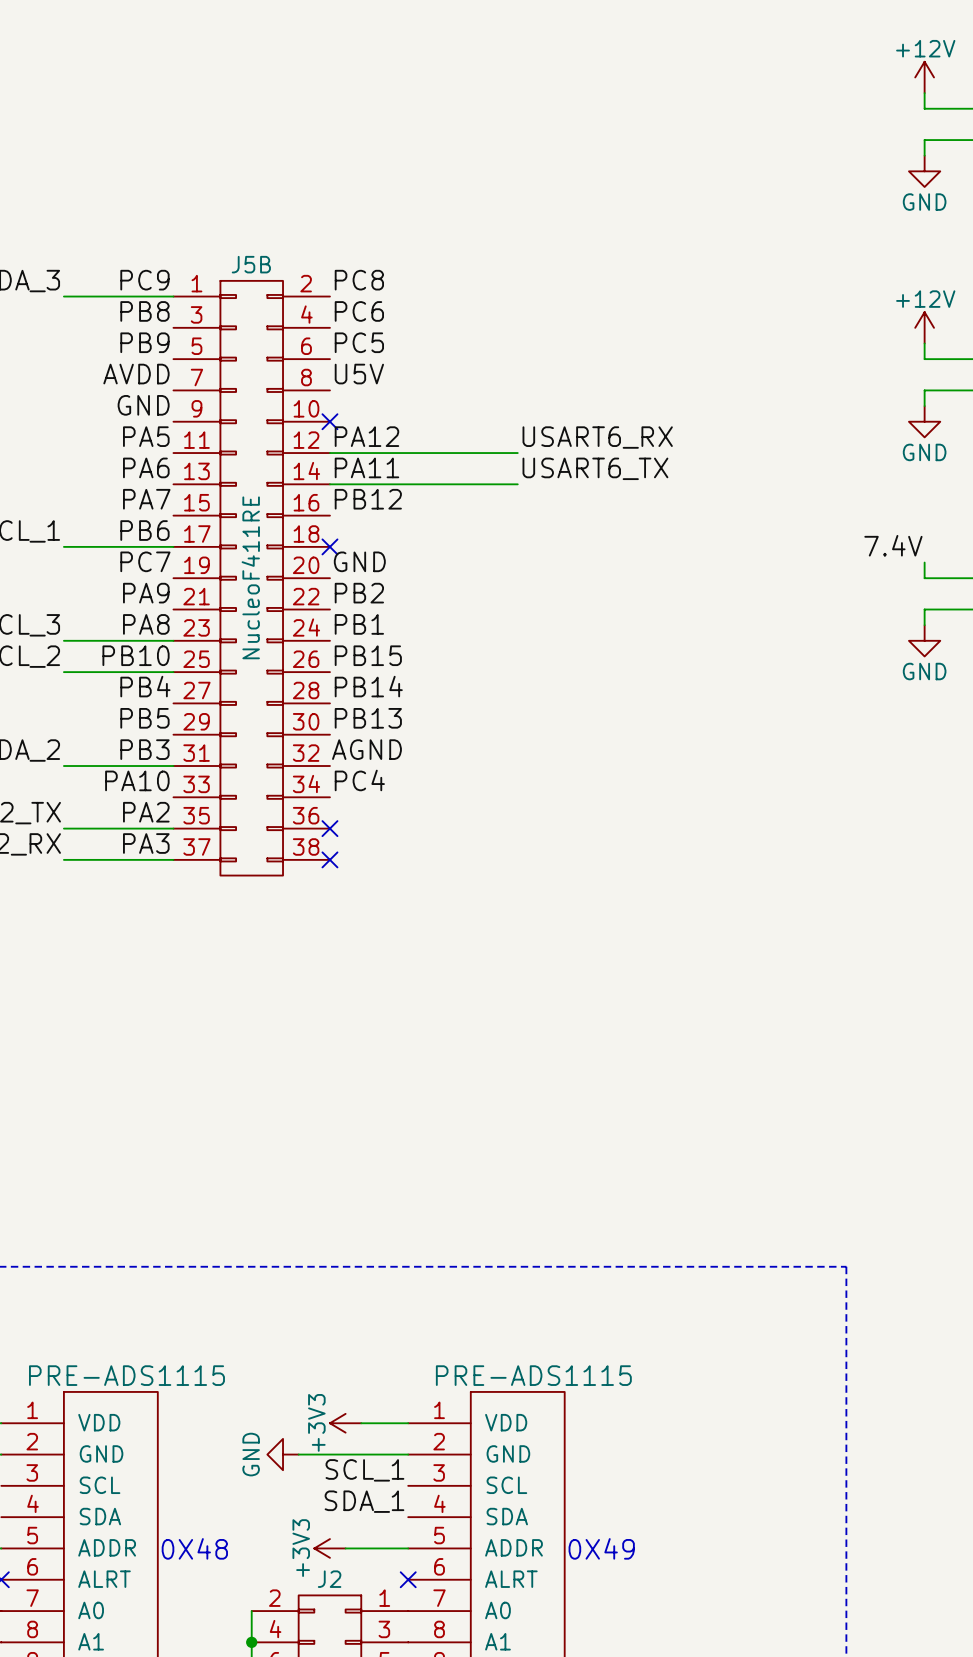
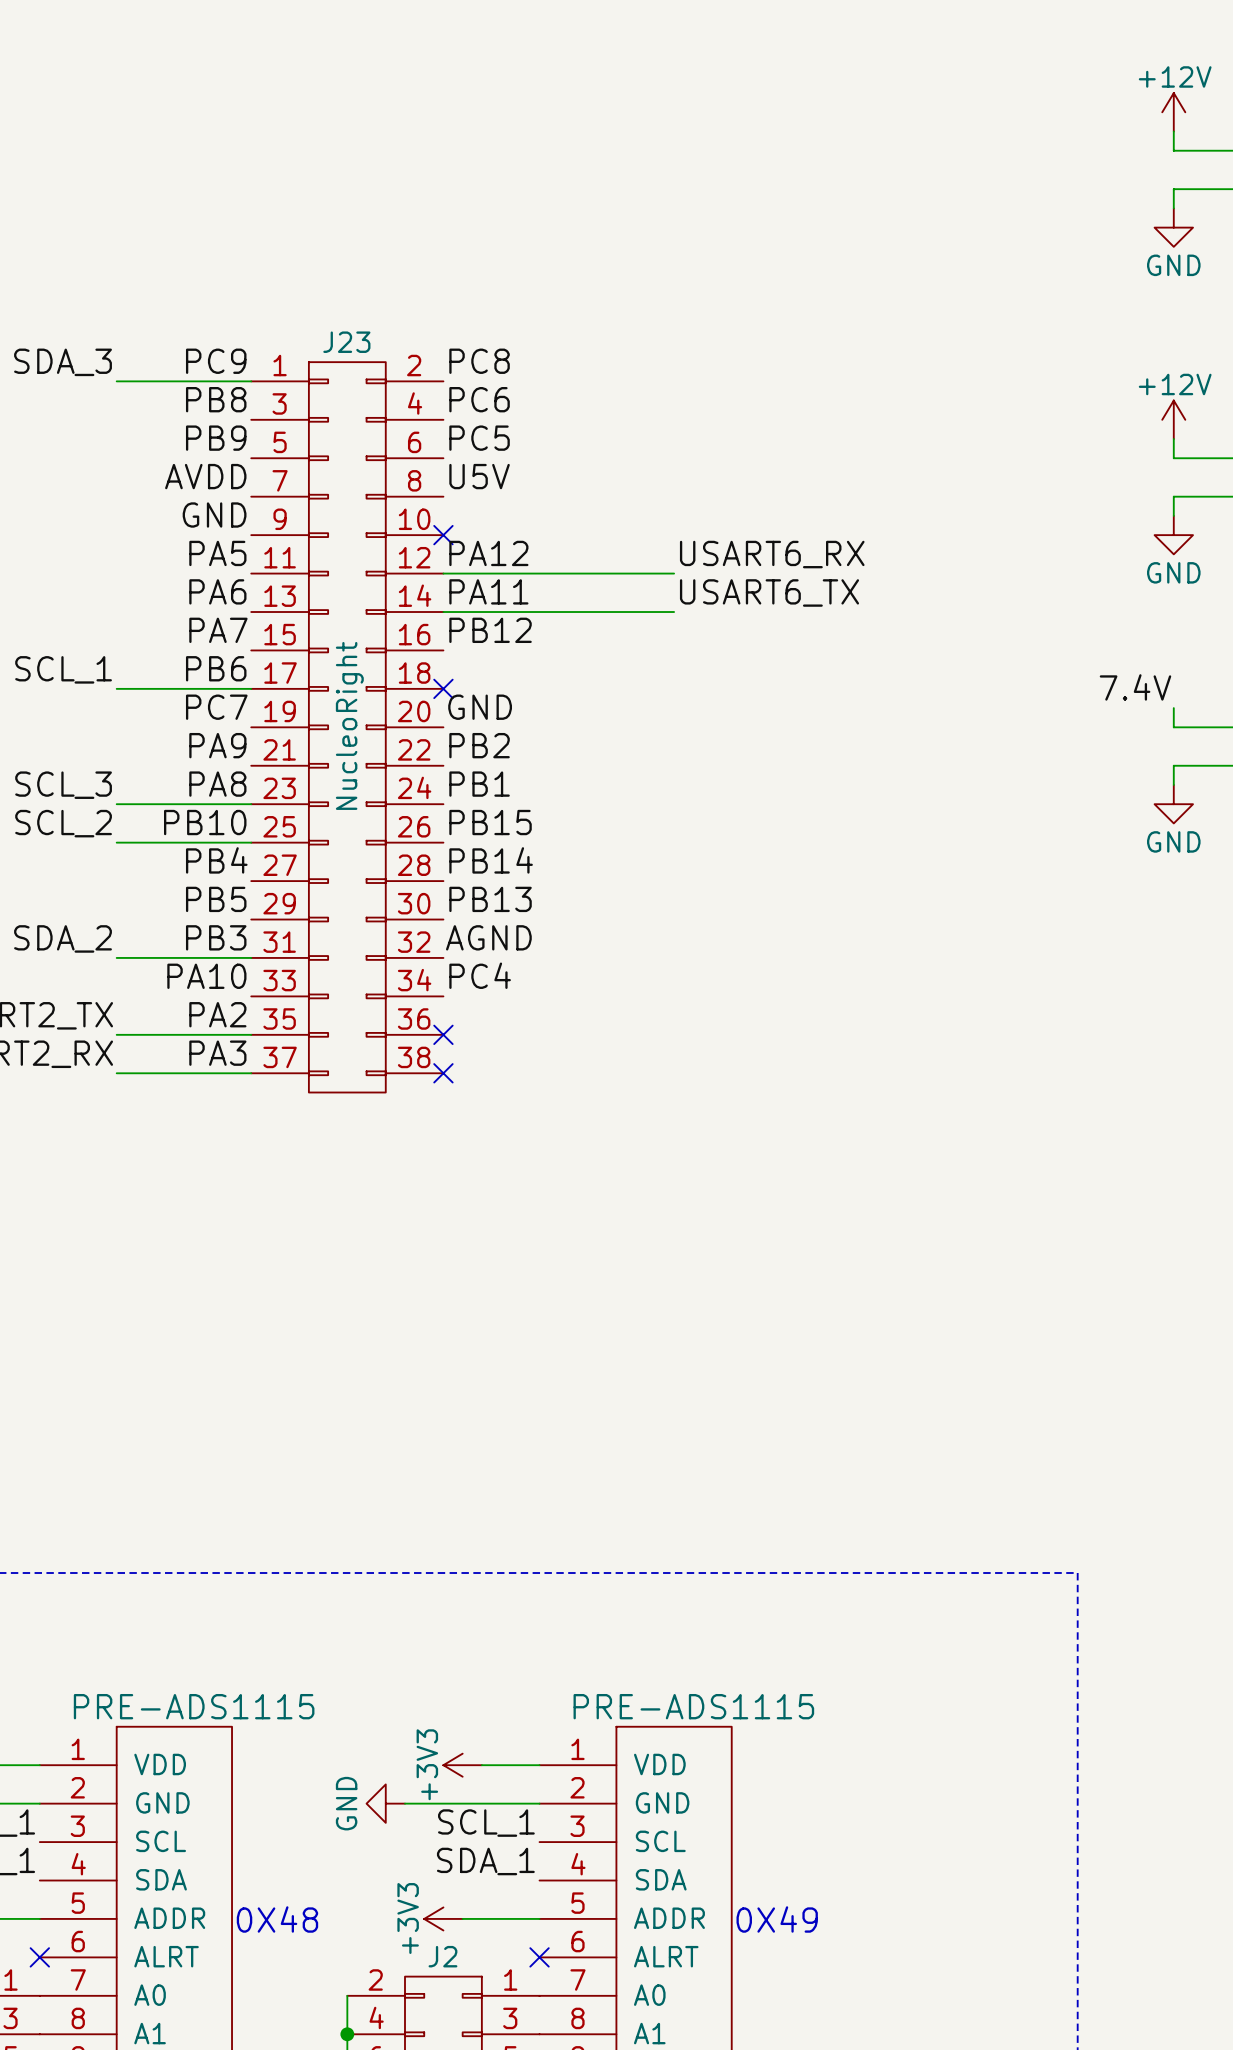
J5B name: J5B (251, 264) -> J23 (346, 342)
J5B value: NucleoF411RE (250, 577) -> NucleoRight (349, 725)

